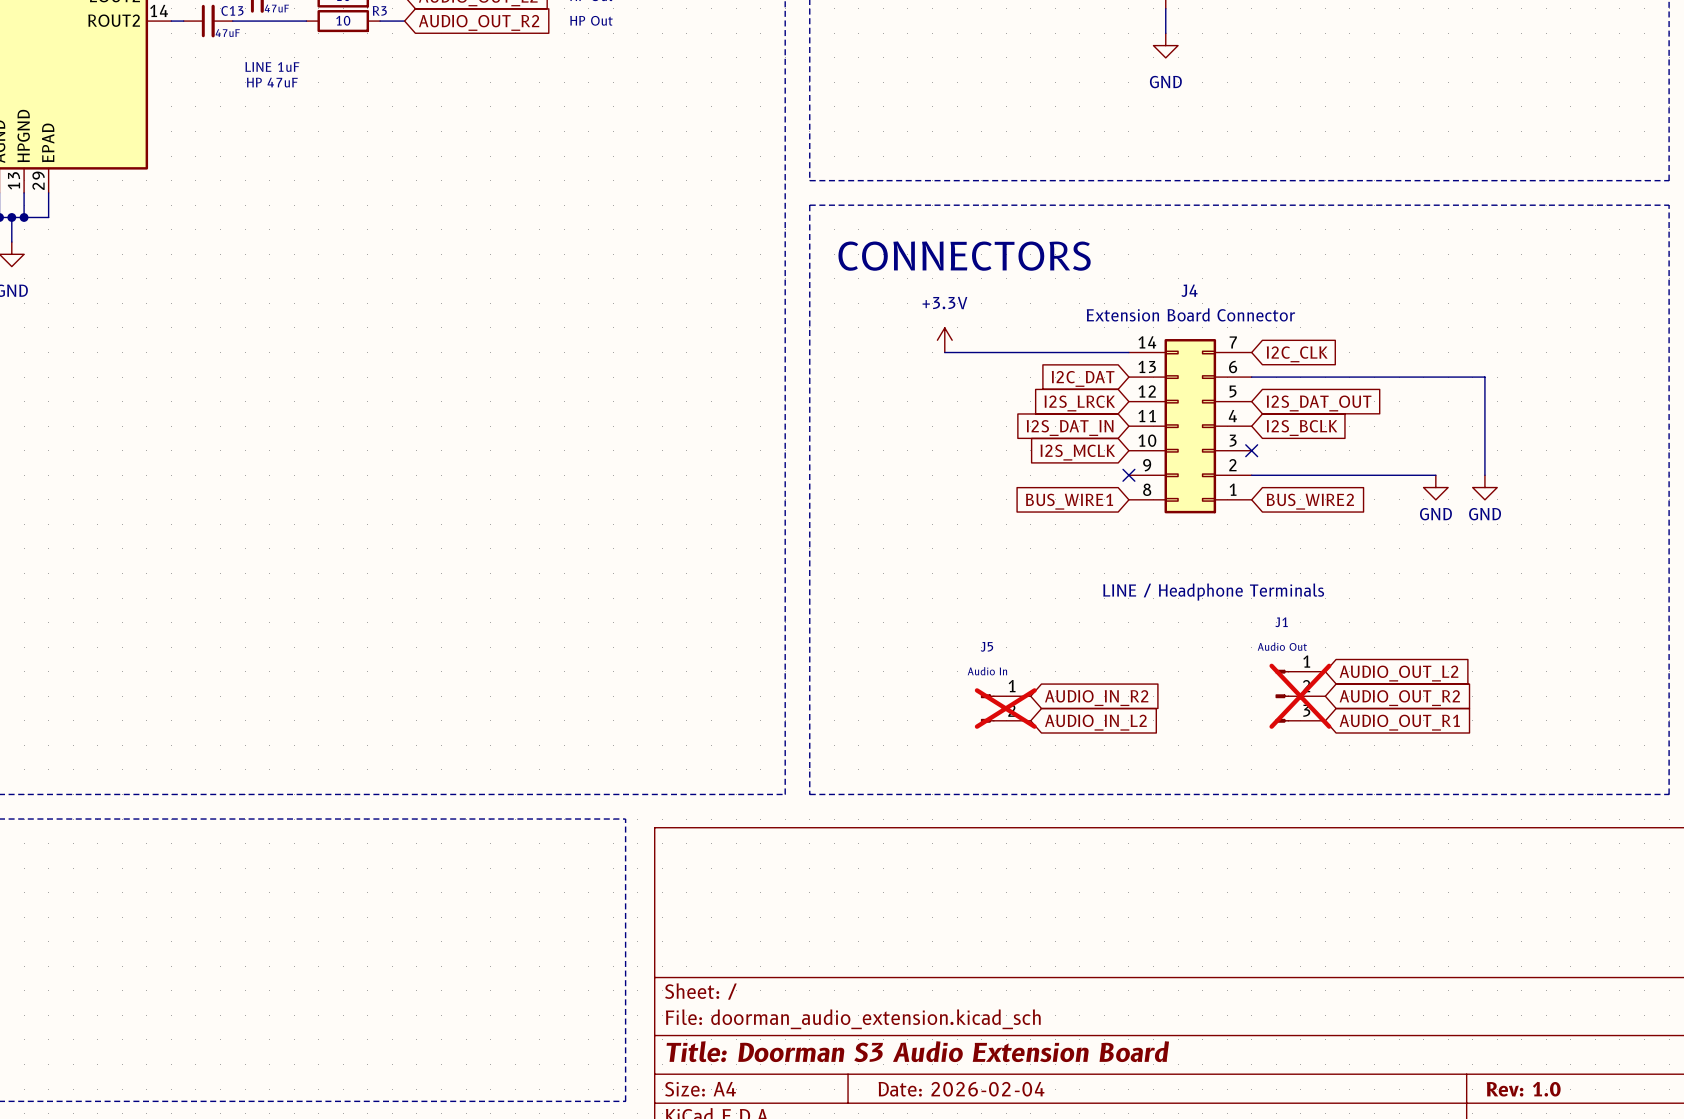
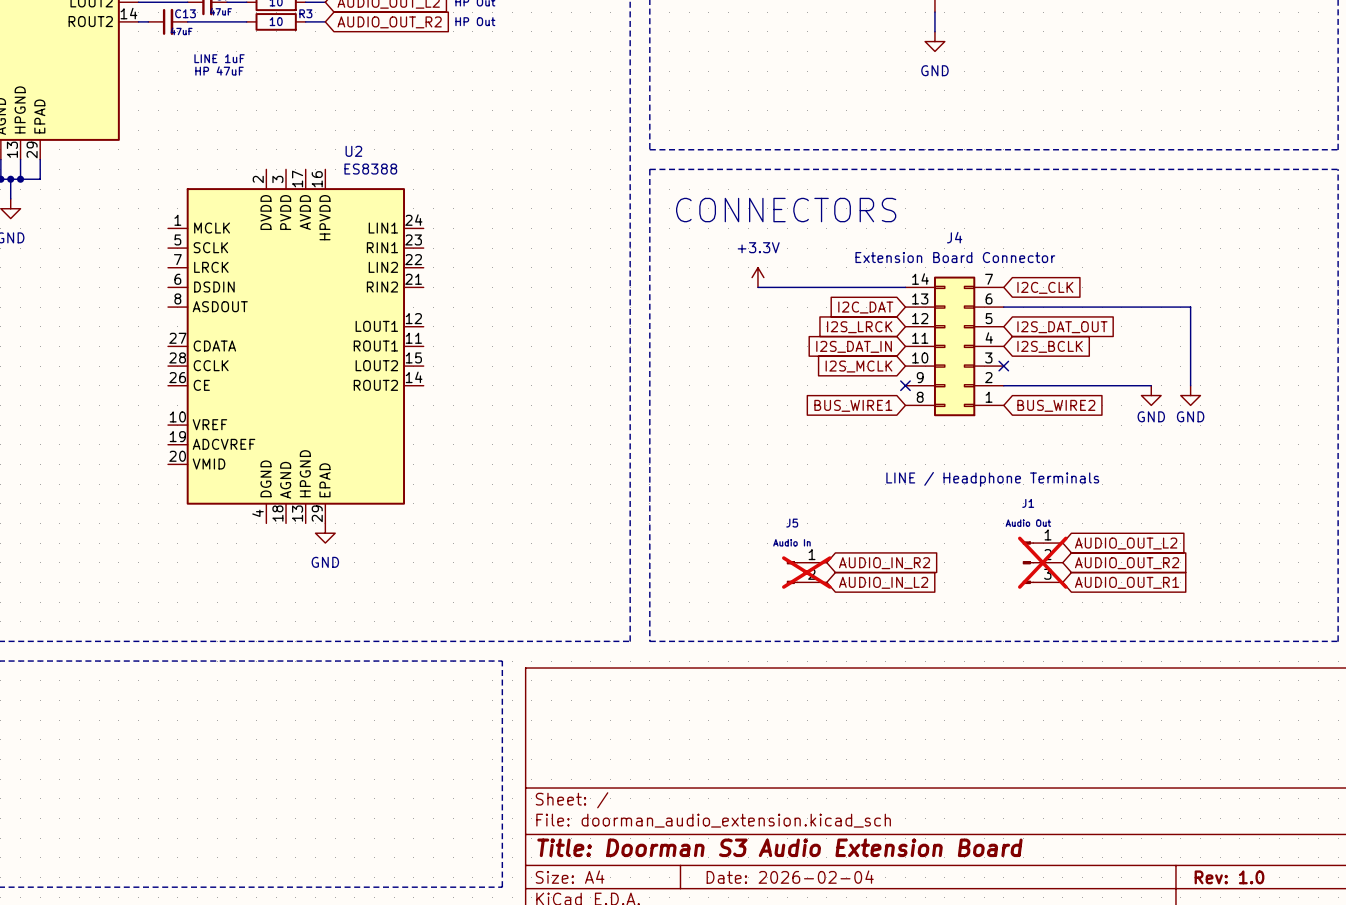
U2: none -> ES8388 (295, 346)
power symbol: none -> GND (325, 533)

